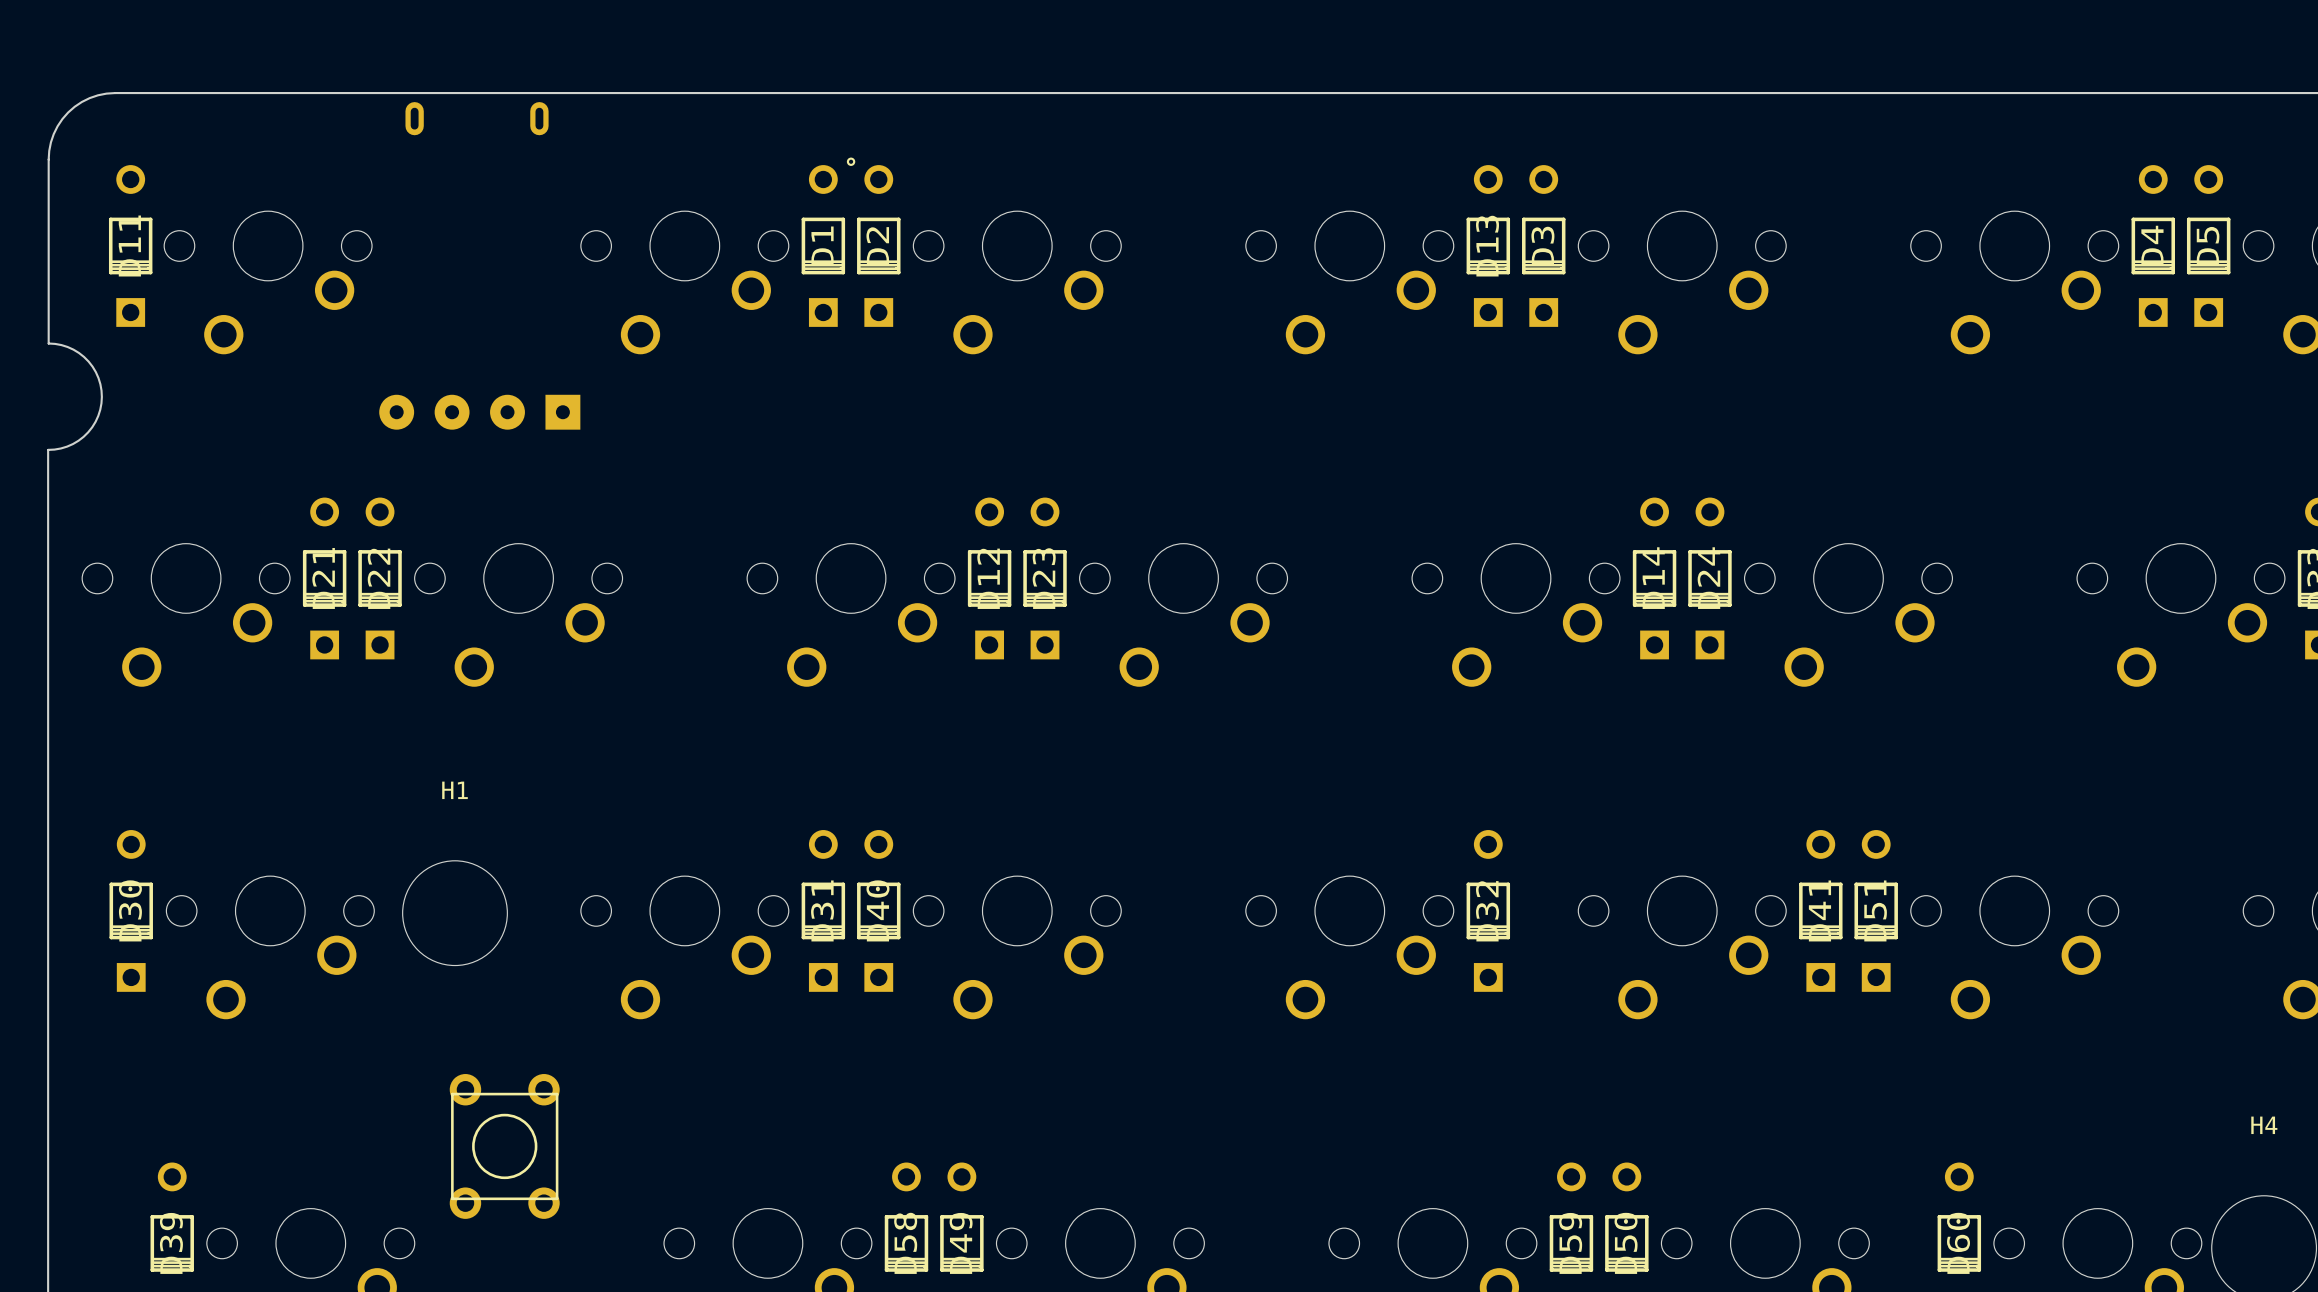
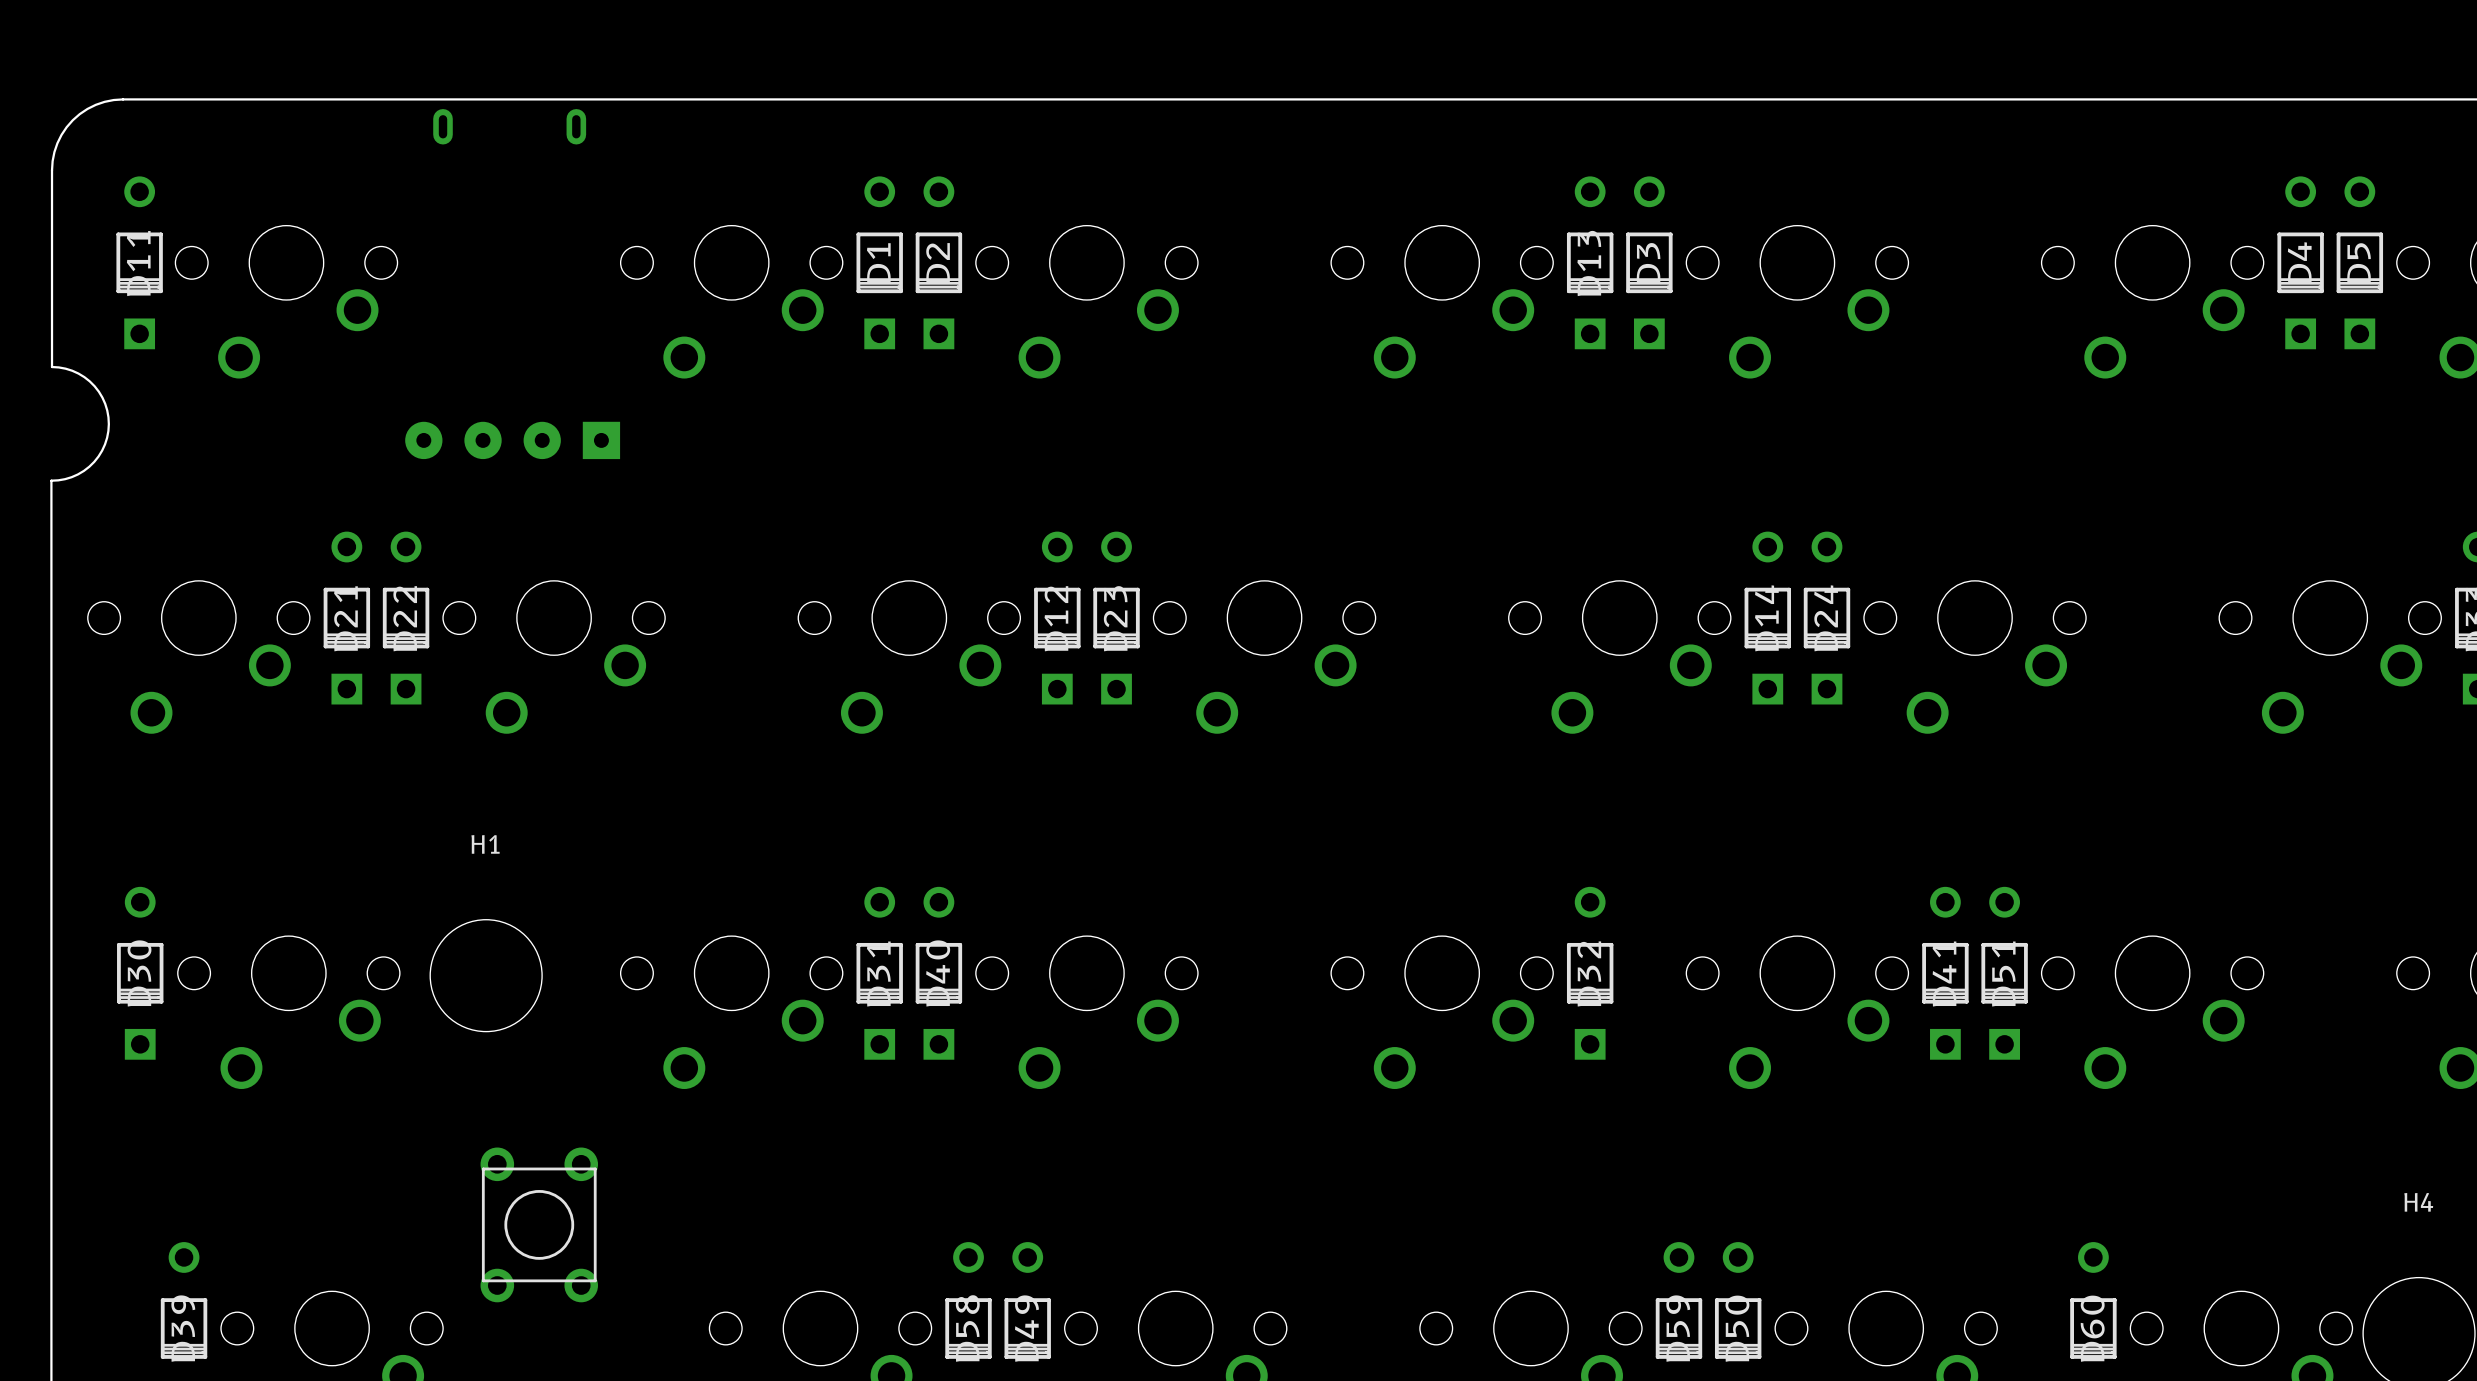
drawing: [846, 157, 856, 166] -> none

